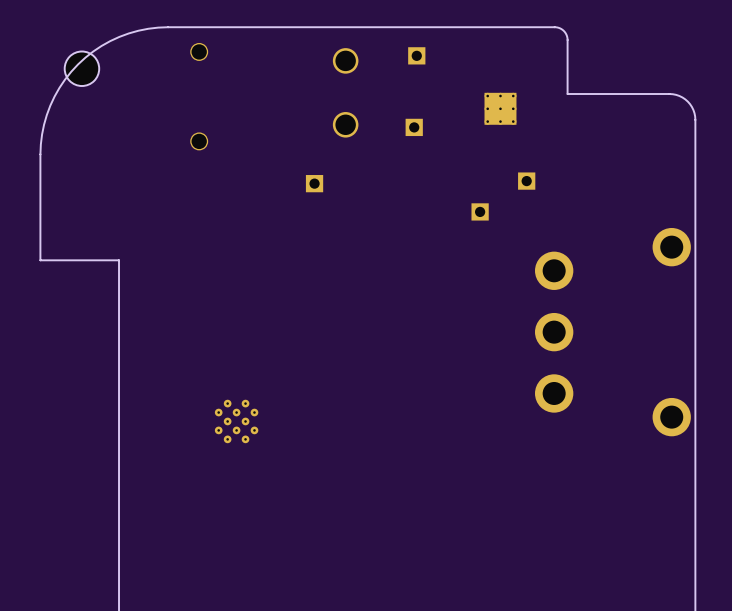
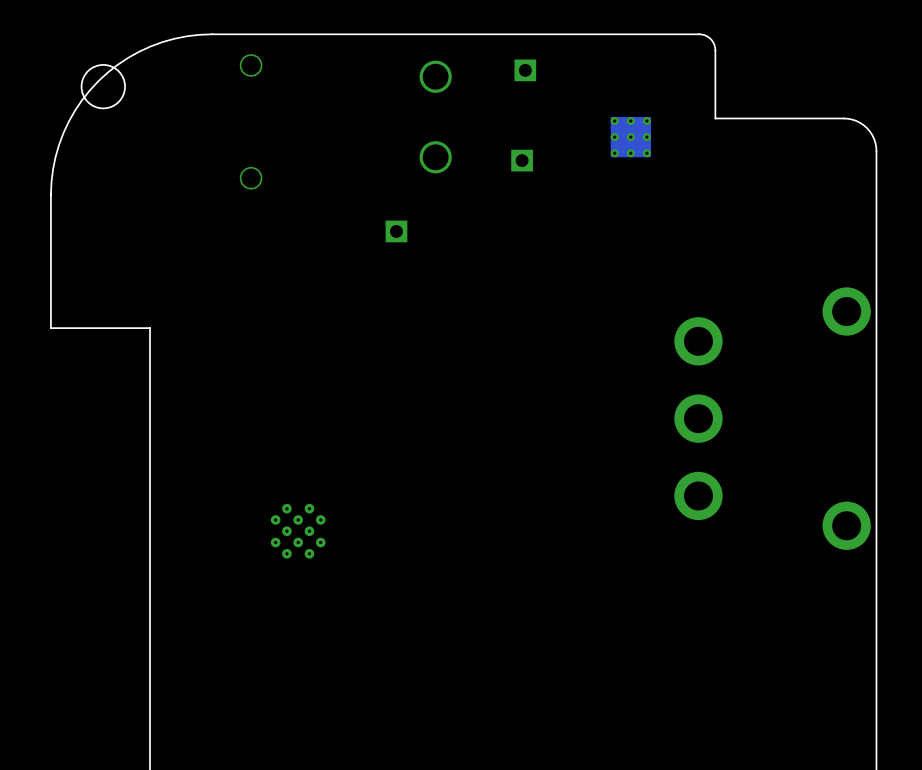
part: (526, 181) -> none
part: (480, 211) -> none

